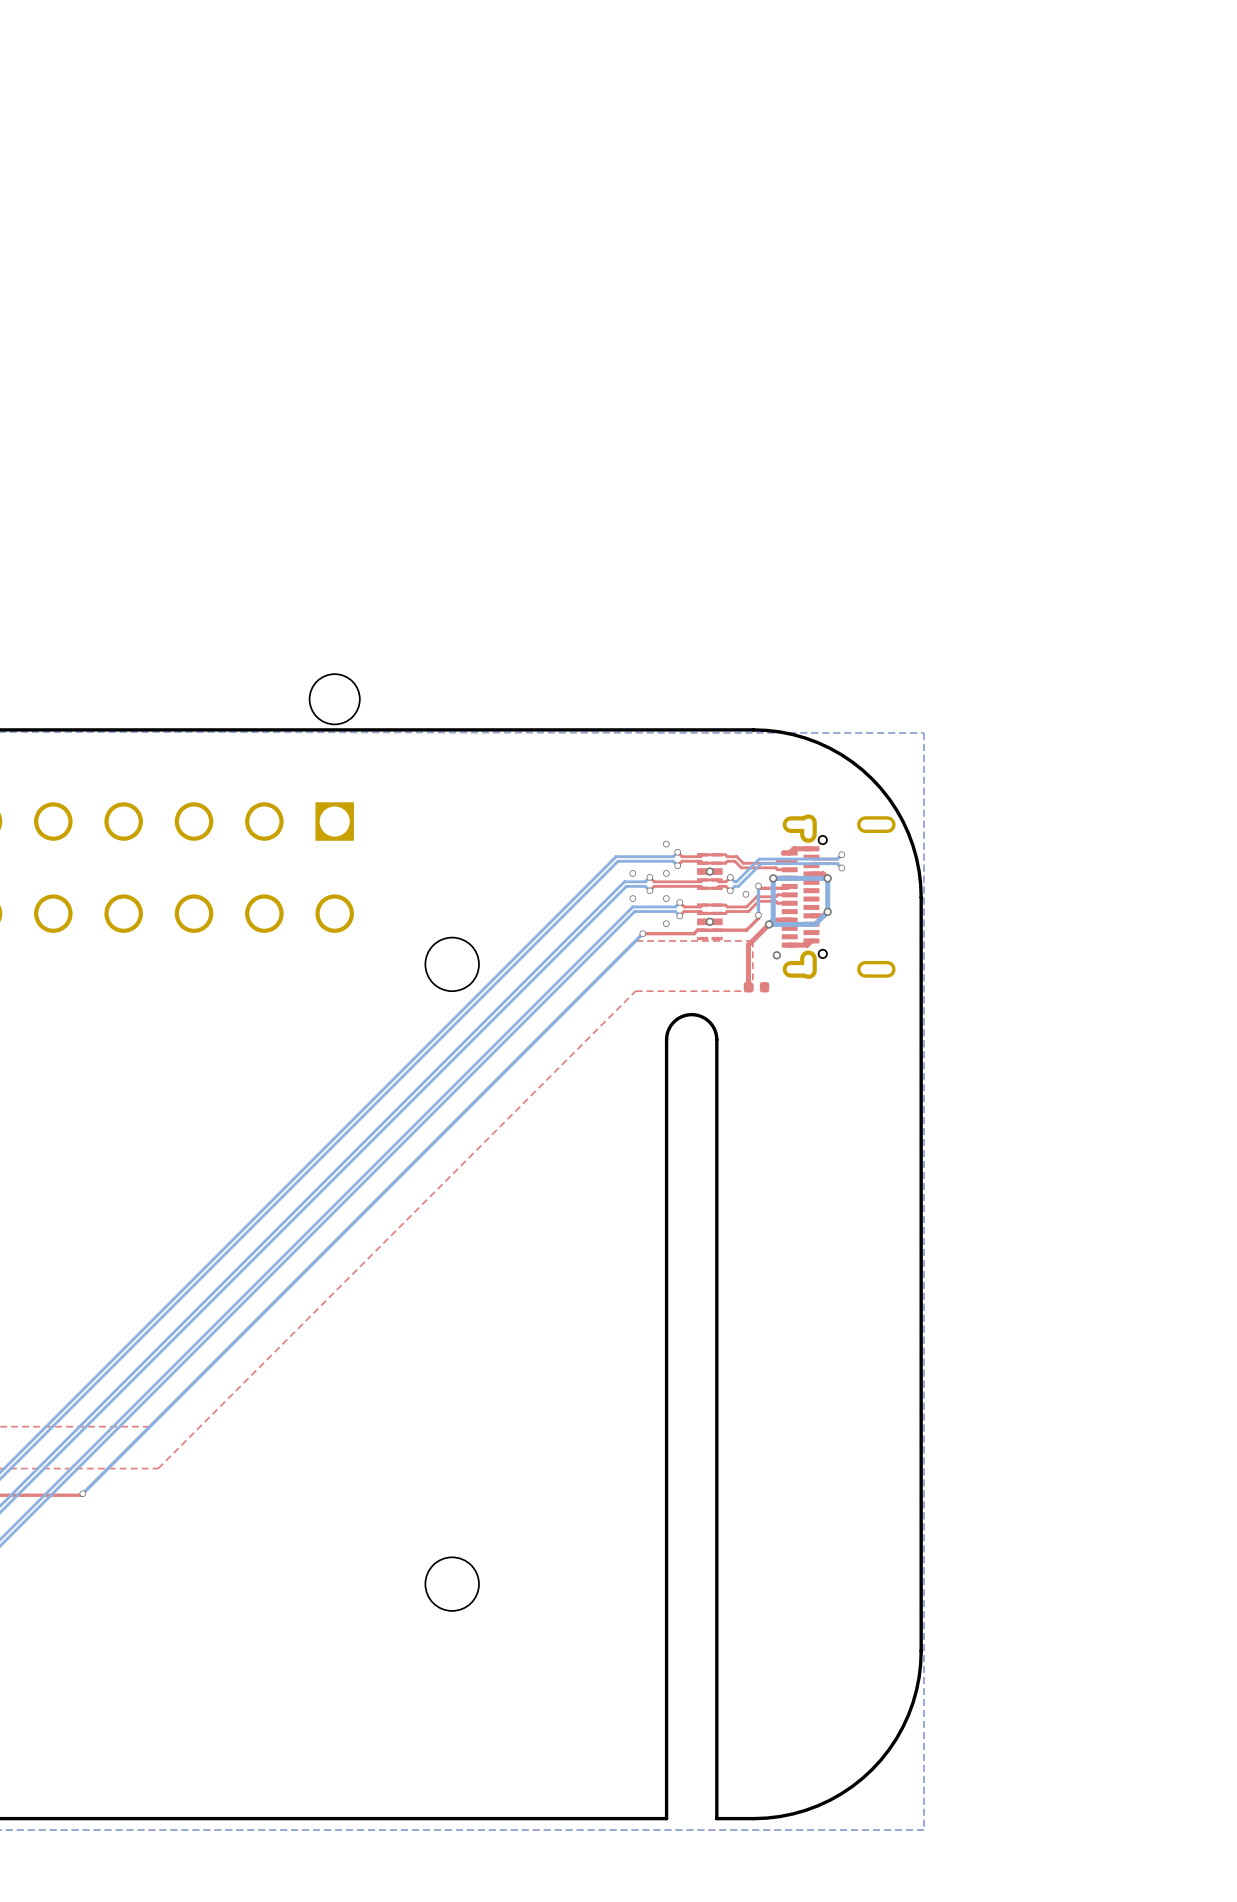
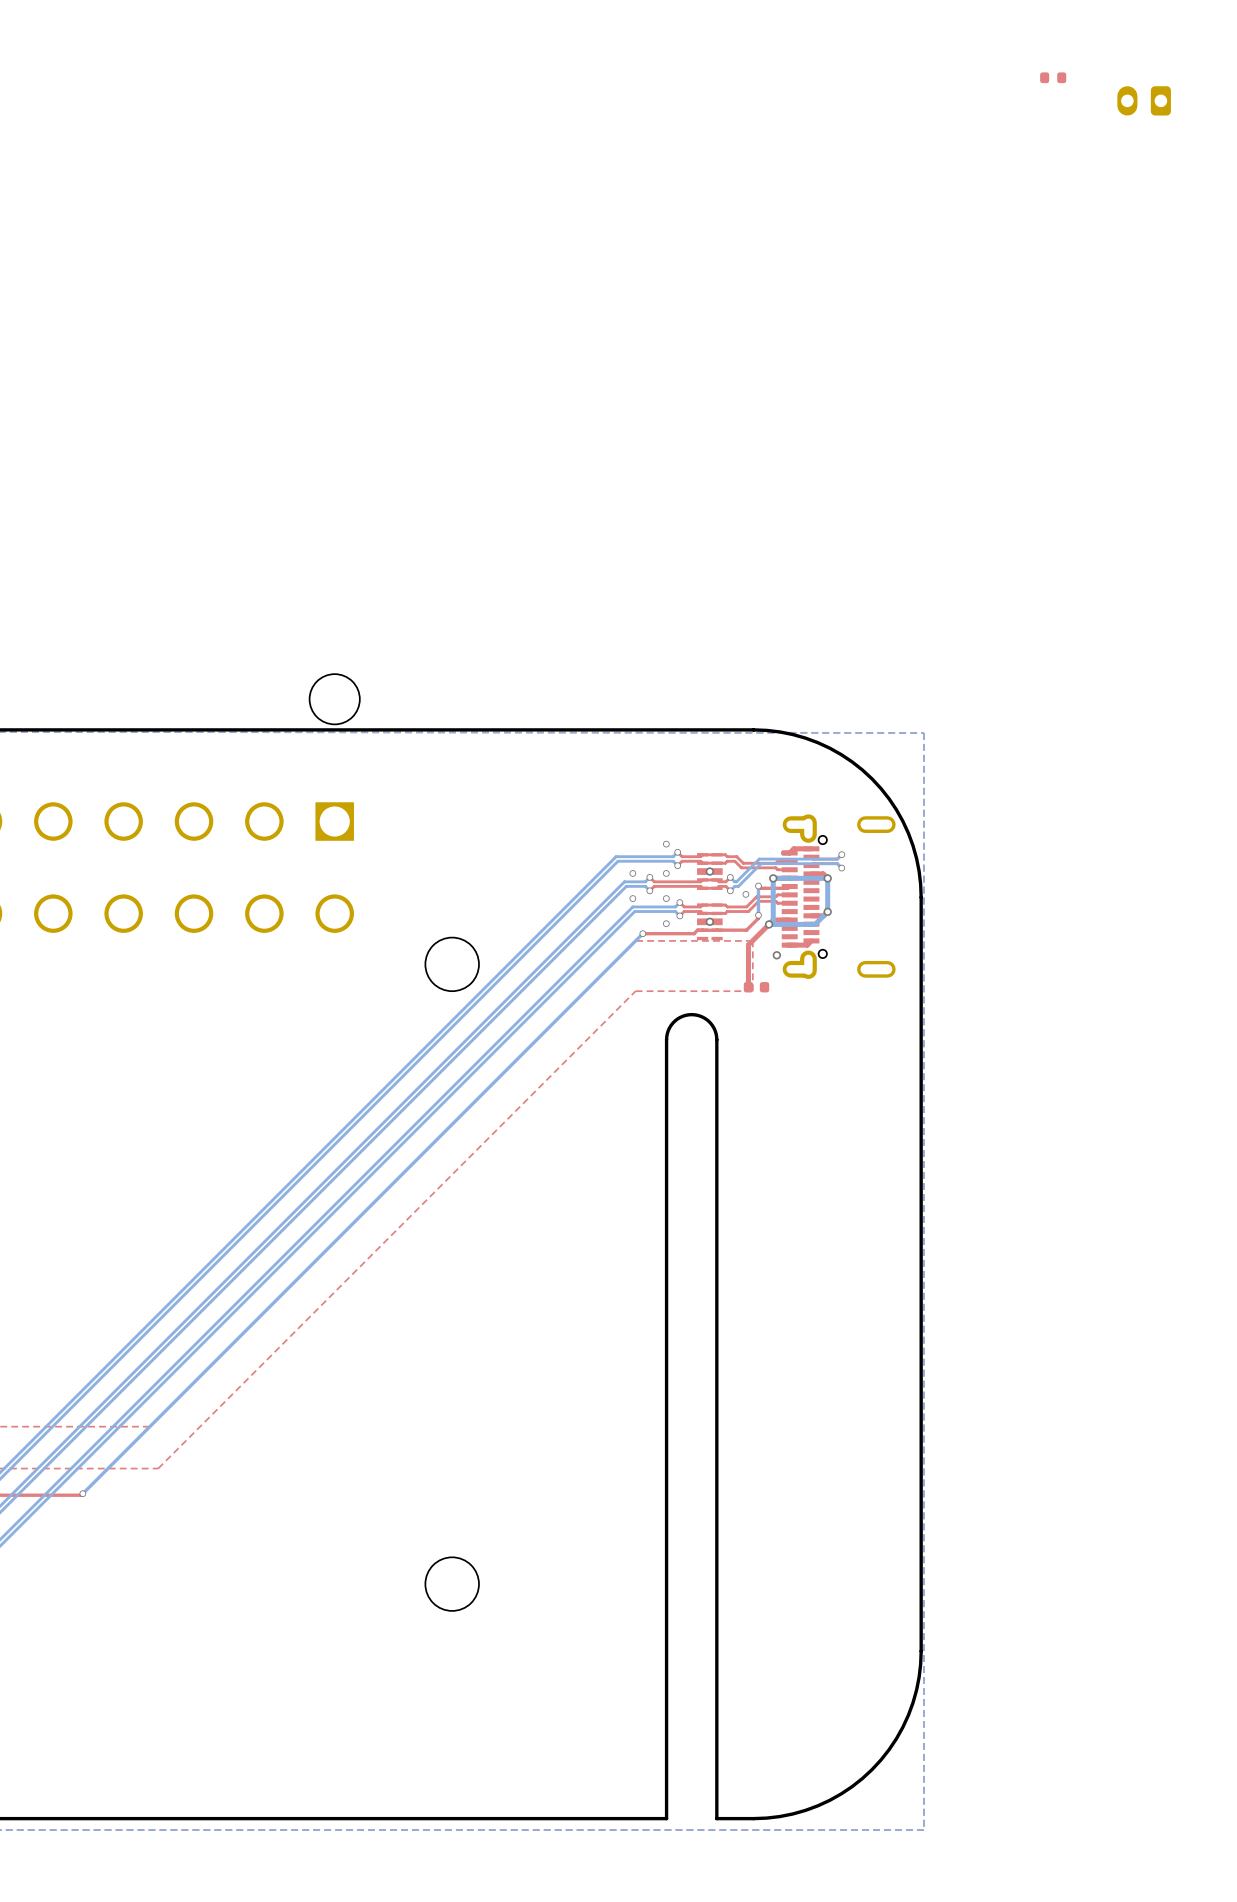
part: none -> (1053, 77)
part: none -> (1144, 100)

